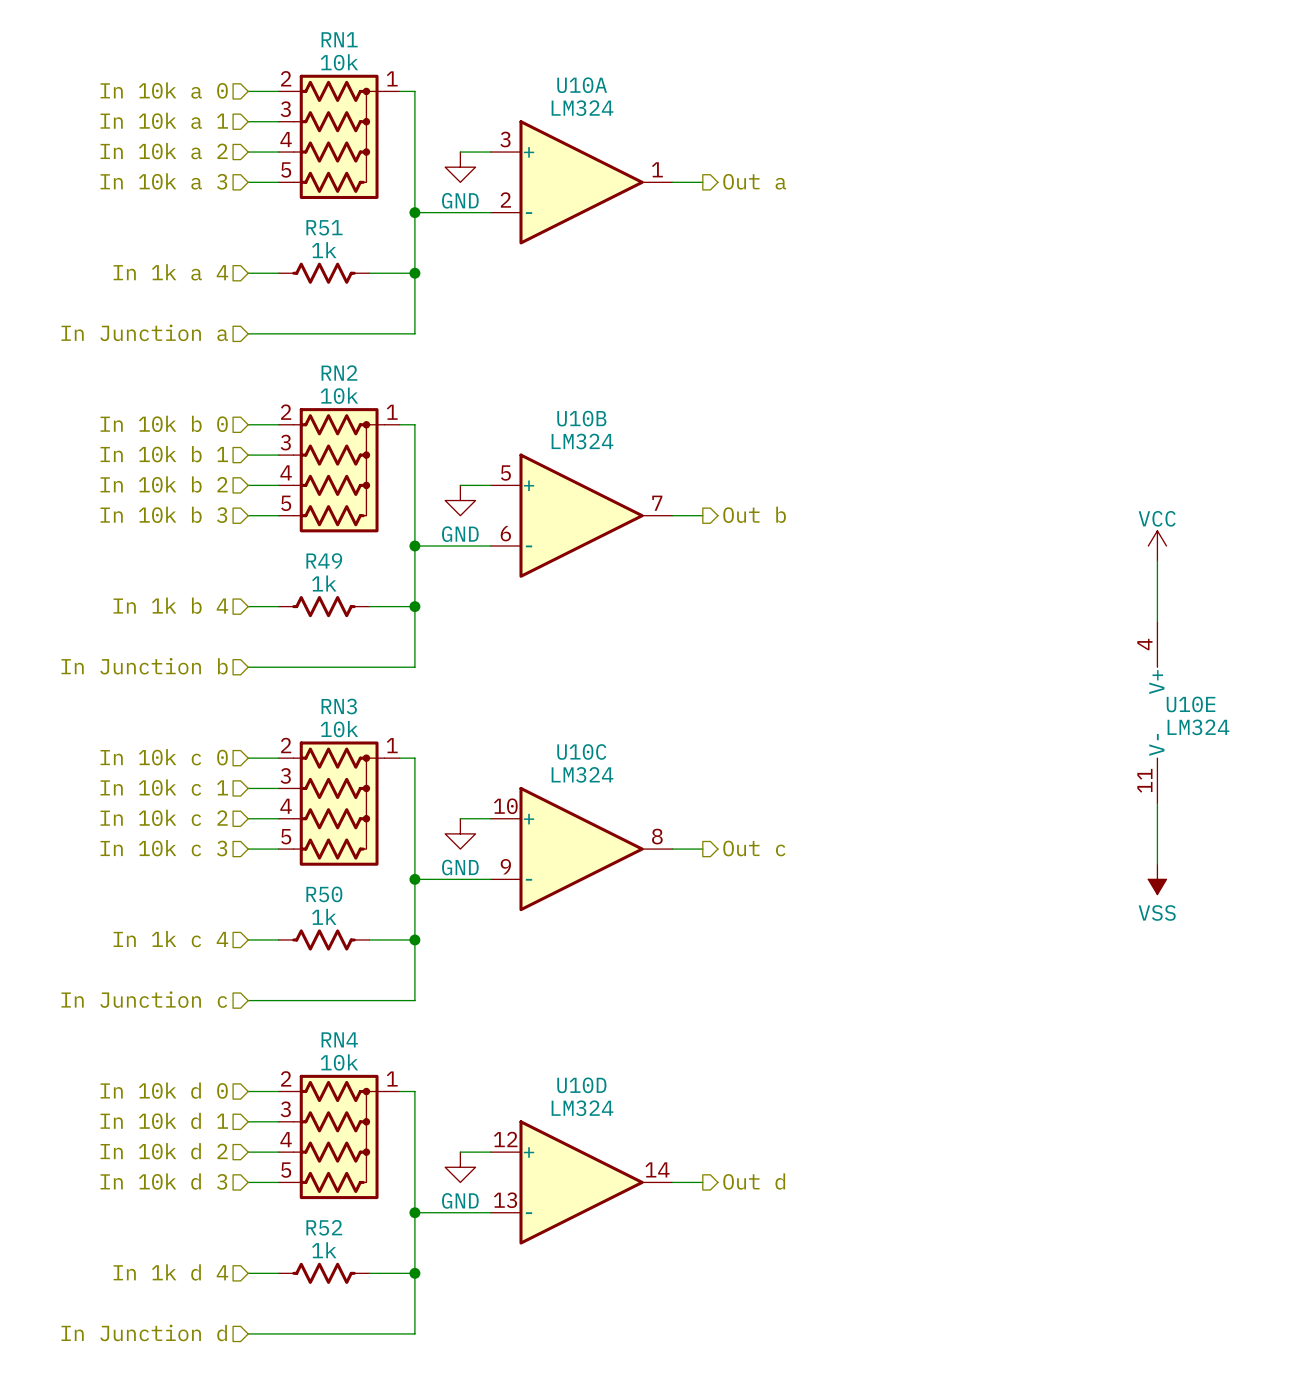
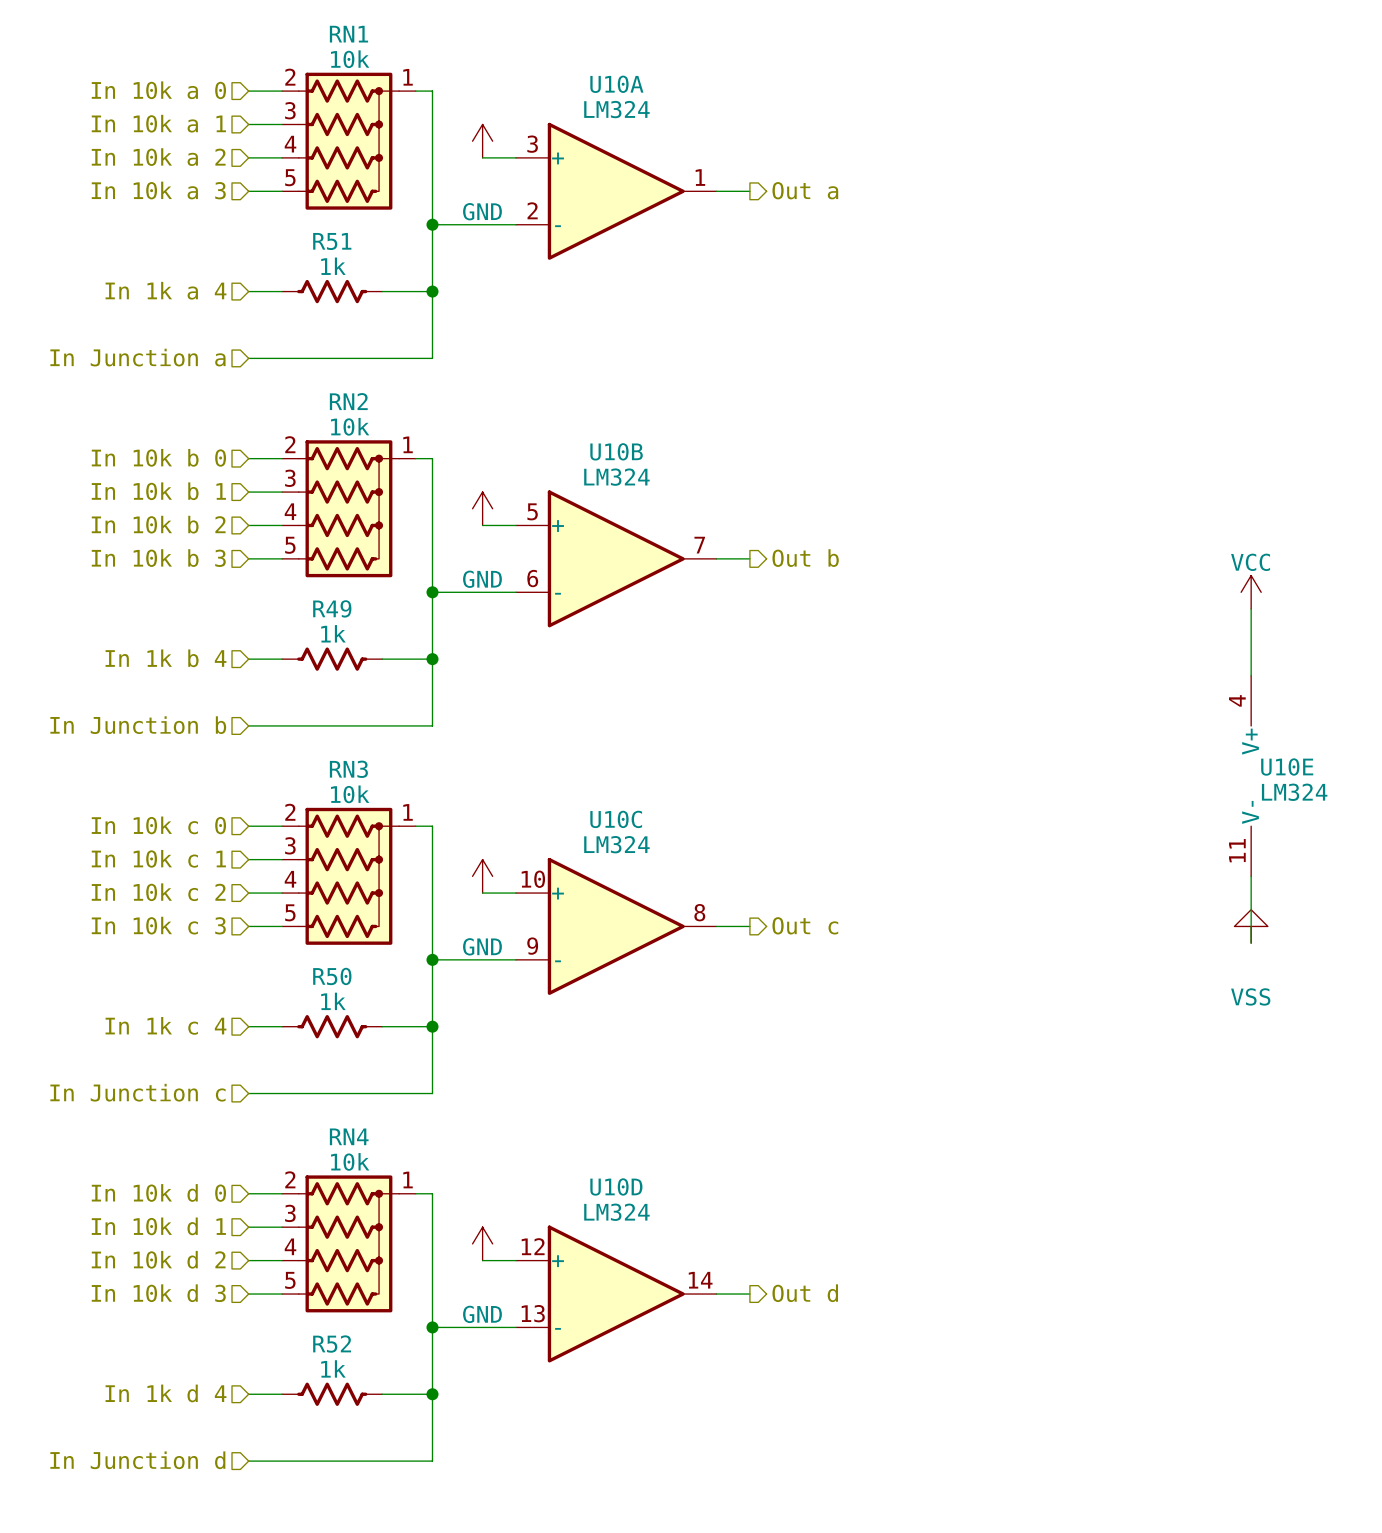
power symbol: none -> GND (482, 141)
power symbol: GND (460, 167) -> none
power symbol: none -> GND (482, 508)
power symbol: GND (460, 500) -> none
power symbol: none -> GND (482, 876)
power symbol: GND (460, 833) -> none
power symbol: none -> VSS (1251, 926)
power symbol: VSS (1157, 879) -> none
power symbol: none -> GND (482, 1243)
power symbol: GND (460, 1167) -> none

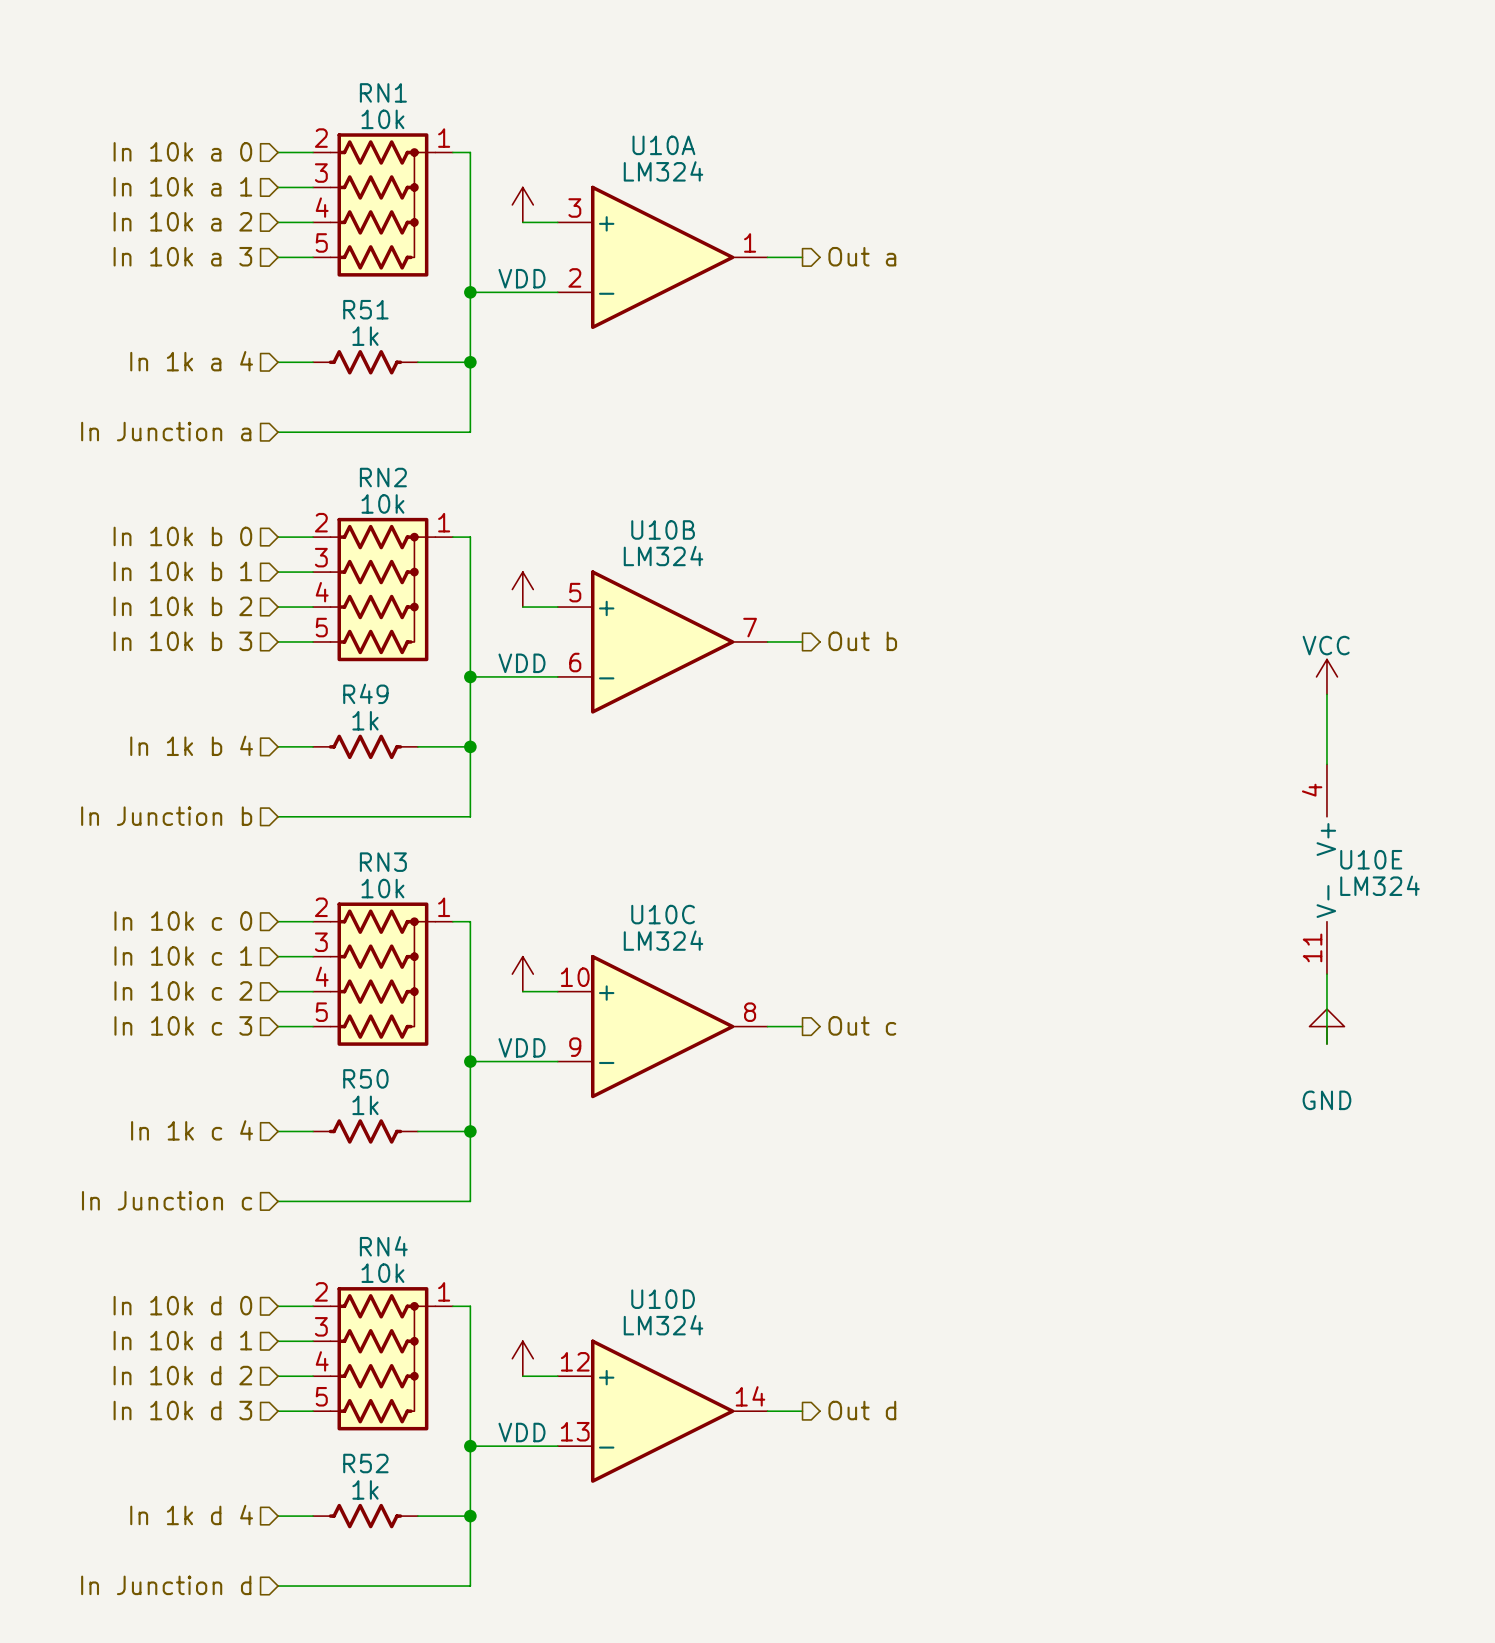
power symbol: GND (482, 141) -> VDD (522, 204)
power symbol: GND (482, 508) -> VDD (522, 589)
power symbol: GND (482, 876) -> VDD (522, 974)
power symbol: VSS (1251, 926) -> GND (1326, 1026)
power symbol: GND (482, 1243) -> VDD (522, 1358)

